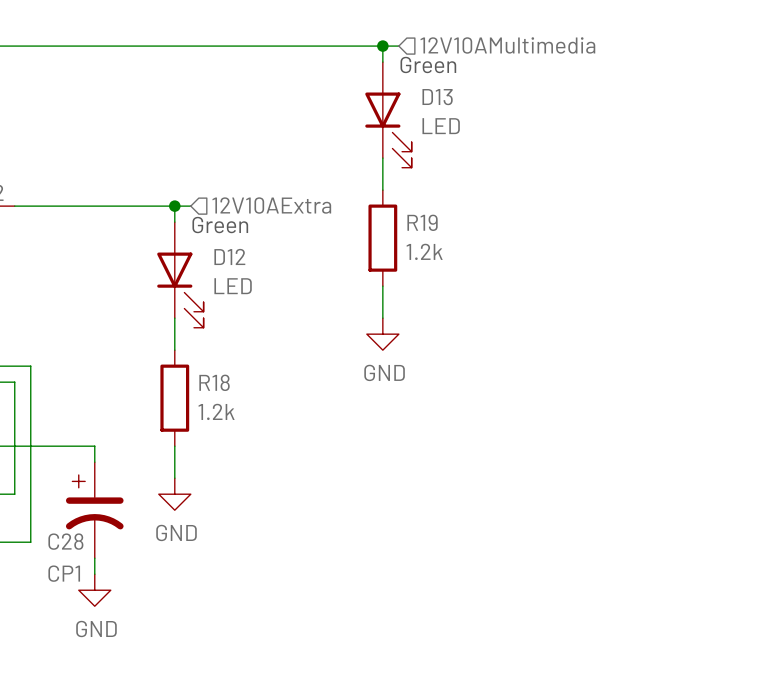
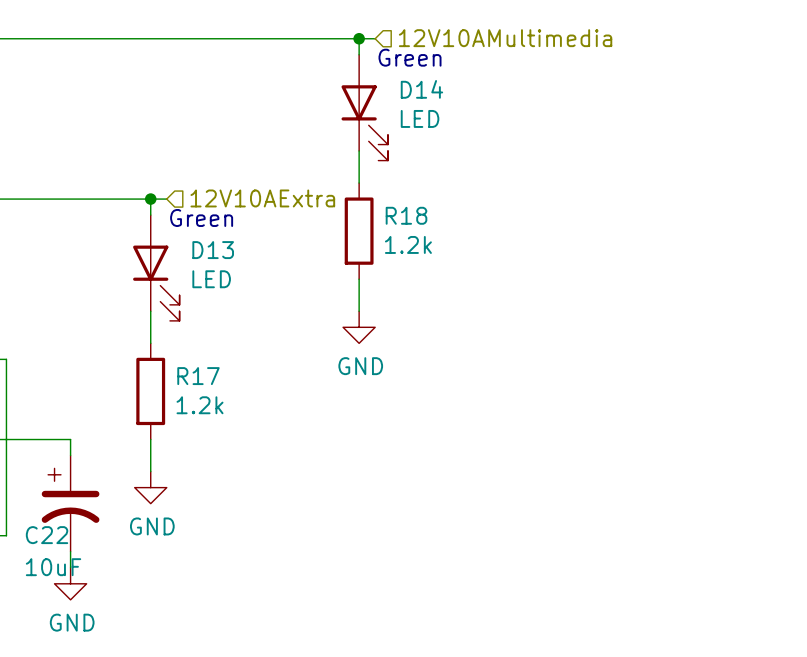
D13 name: D13 (437, 97) -> D14 (421, 89)
R19 name: R19 (422, 222) -> R18 (406, 215)
D12 name: D12 (229, 256) -> D13 (213, 250)
R18 name: R18 (214, 382) -> R17 (198, 376)
C28 name: C28 (65, 541) -> C22 (47, 535)
C28 value: CP1 (64, 573) -> 10uF (53, 567)

